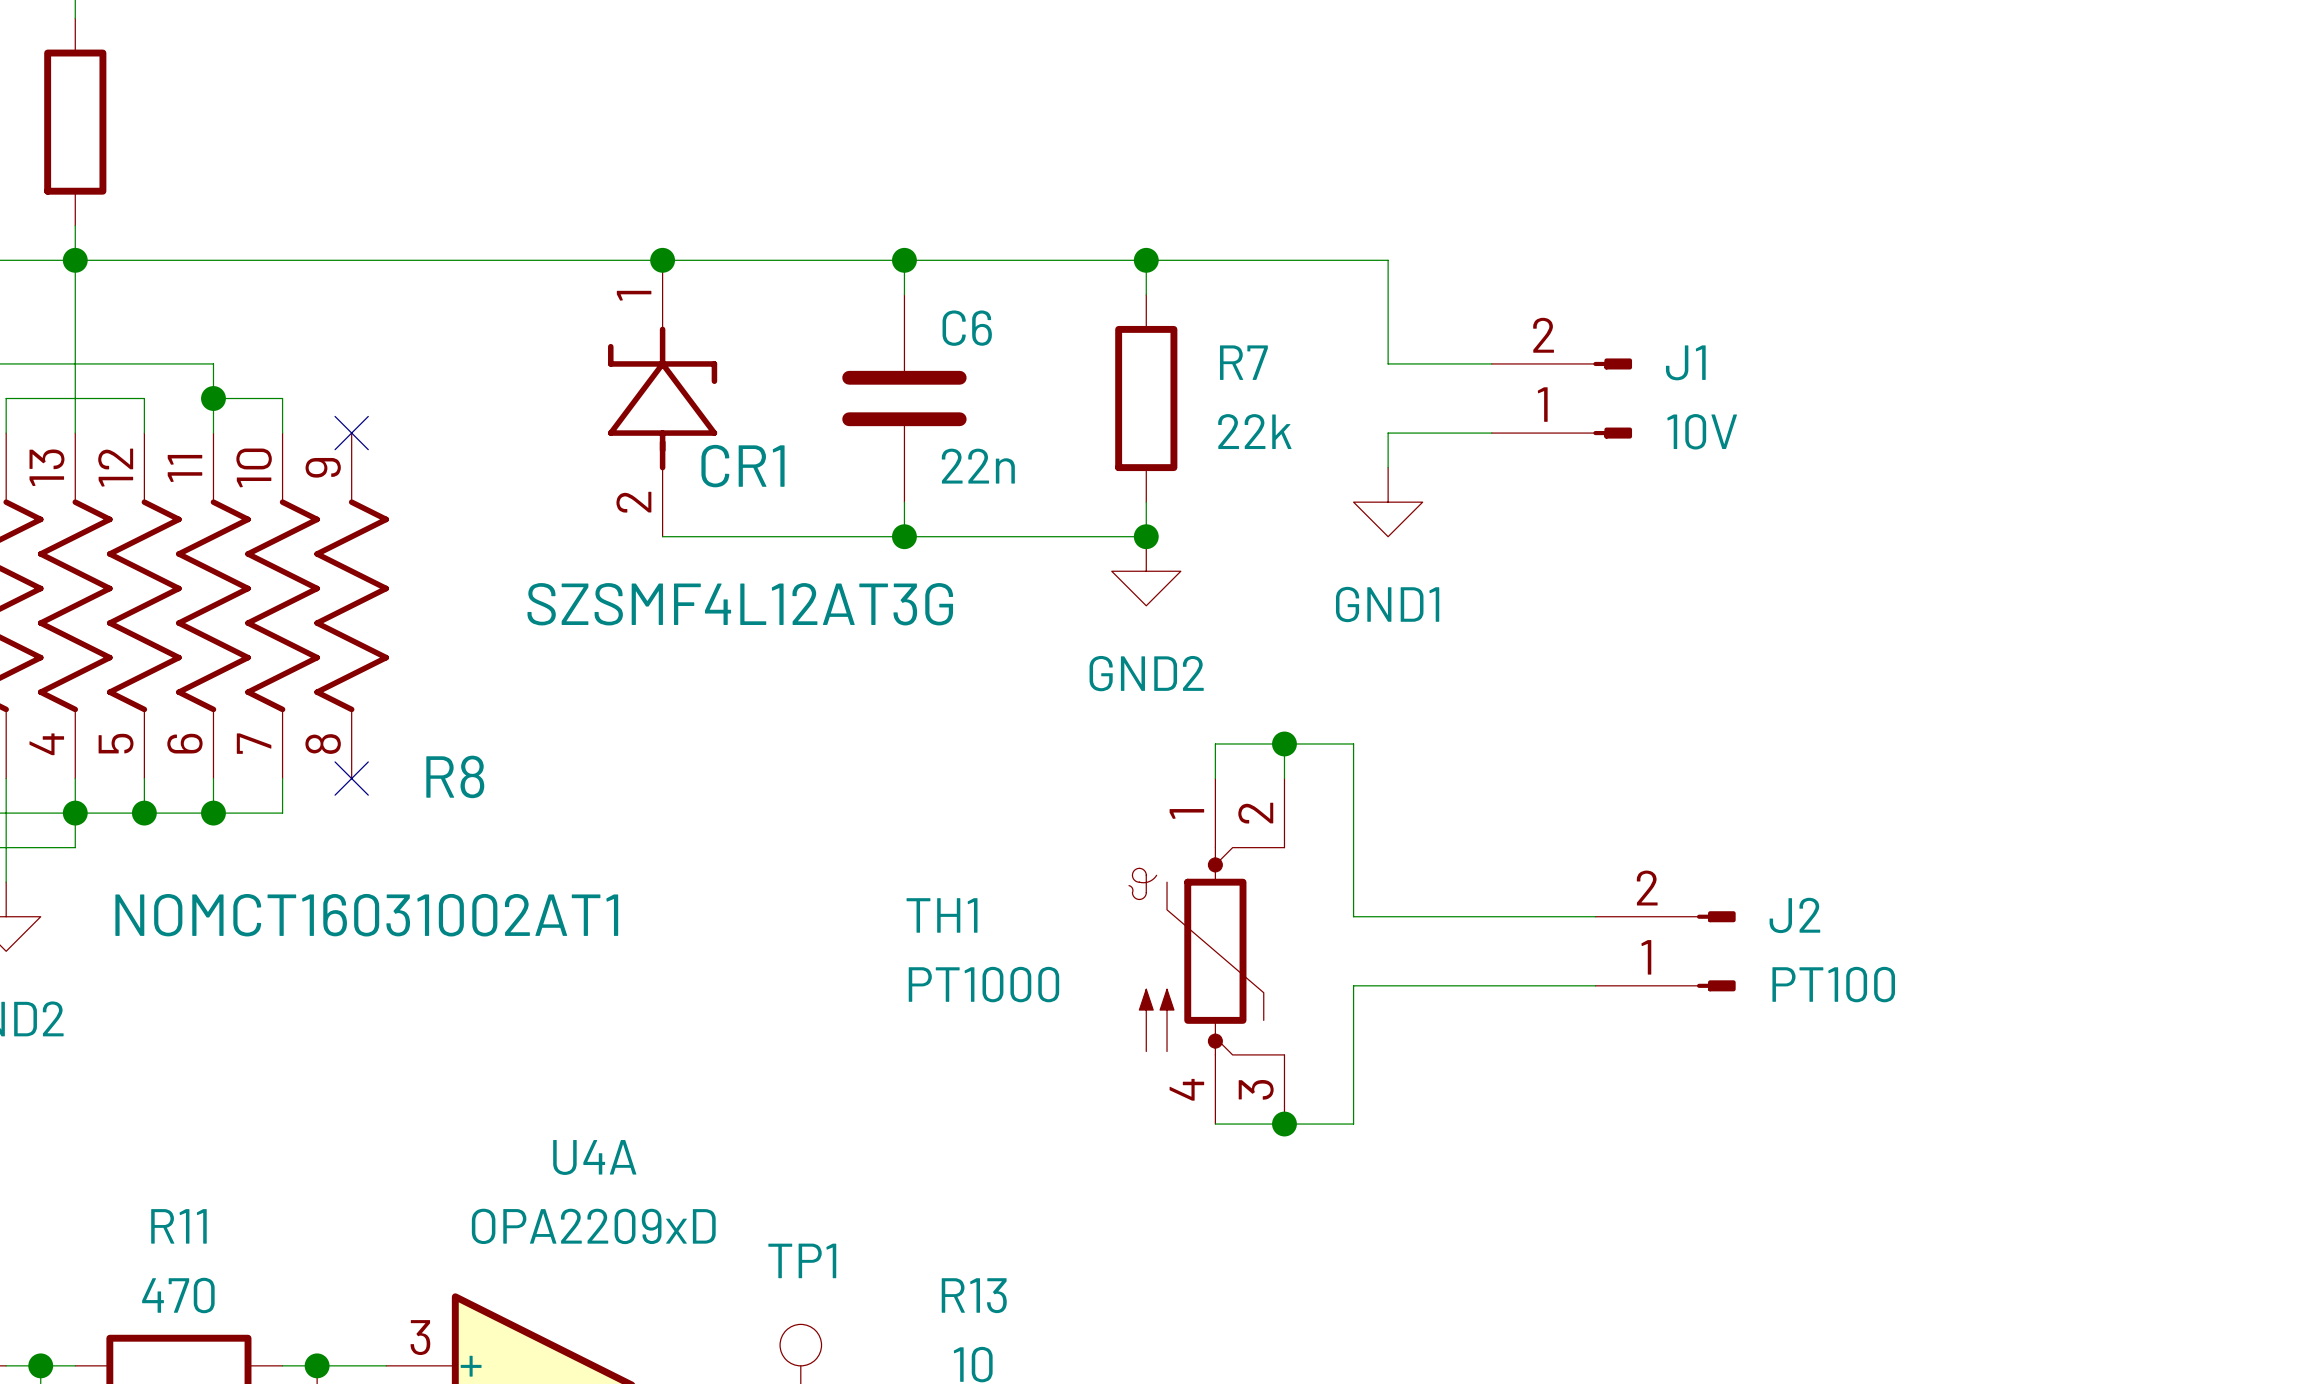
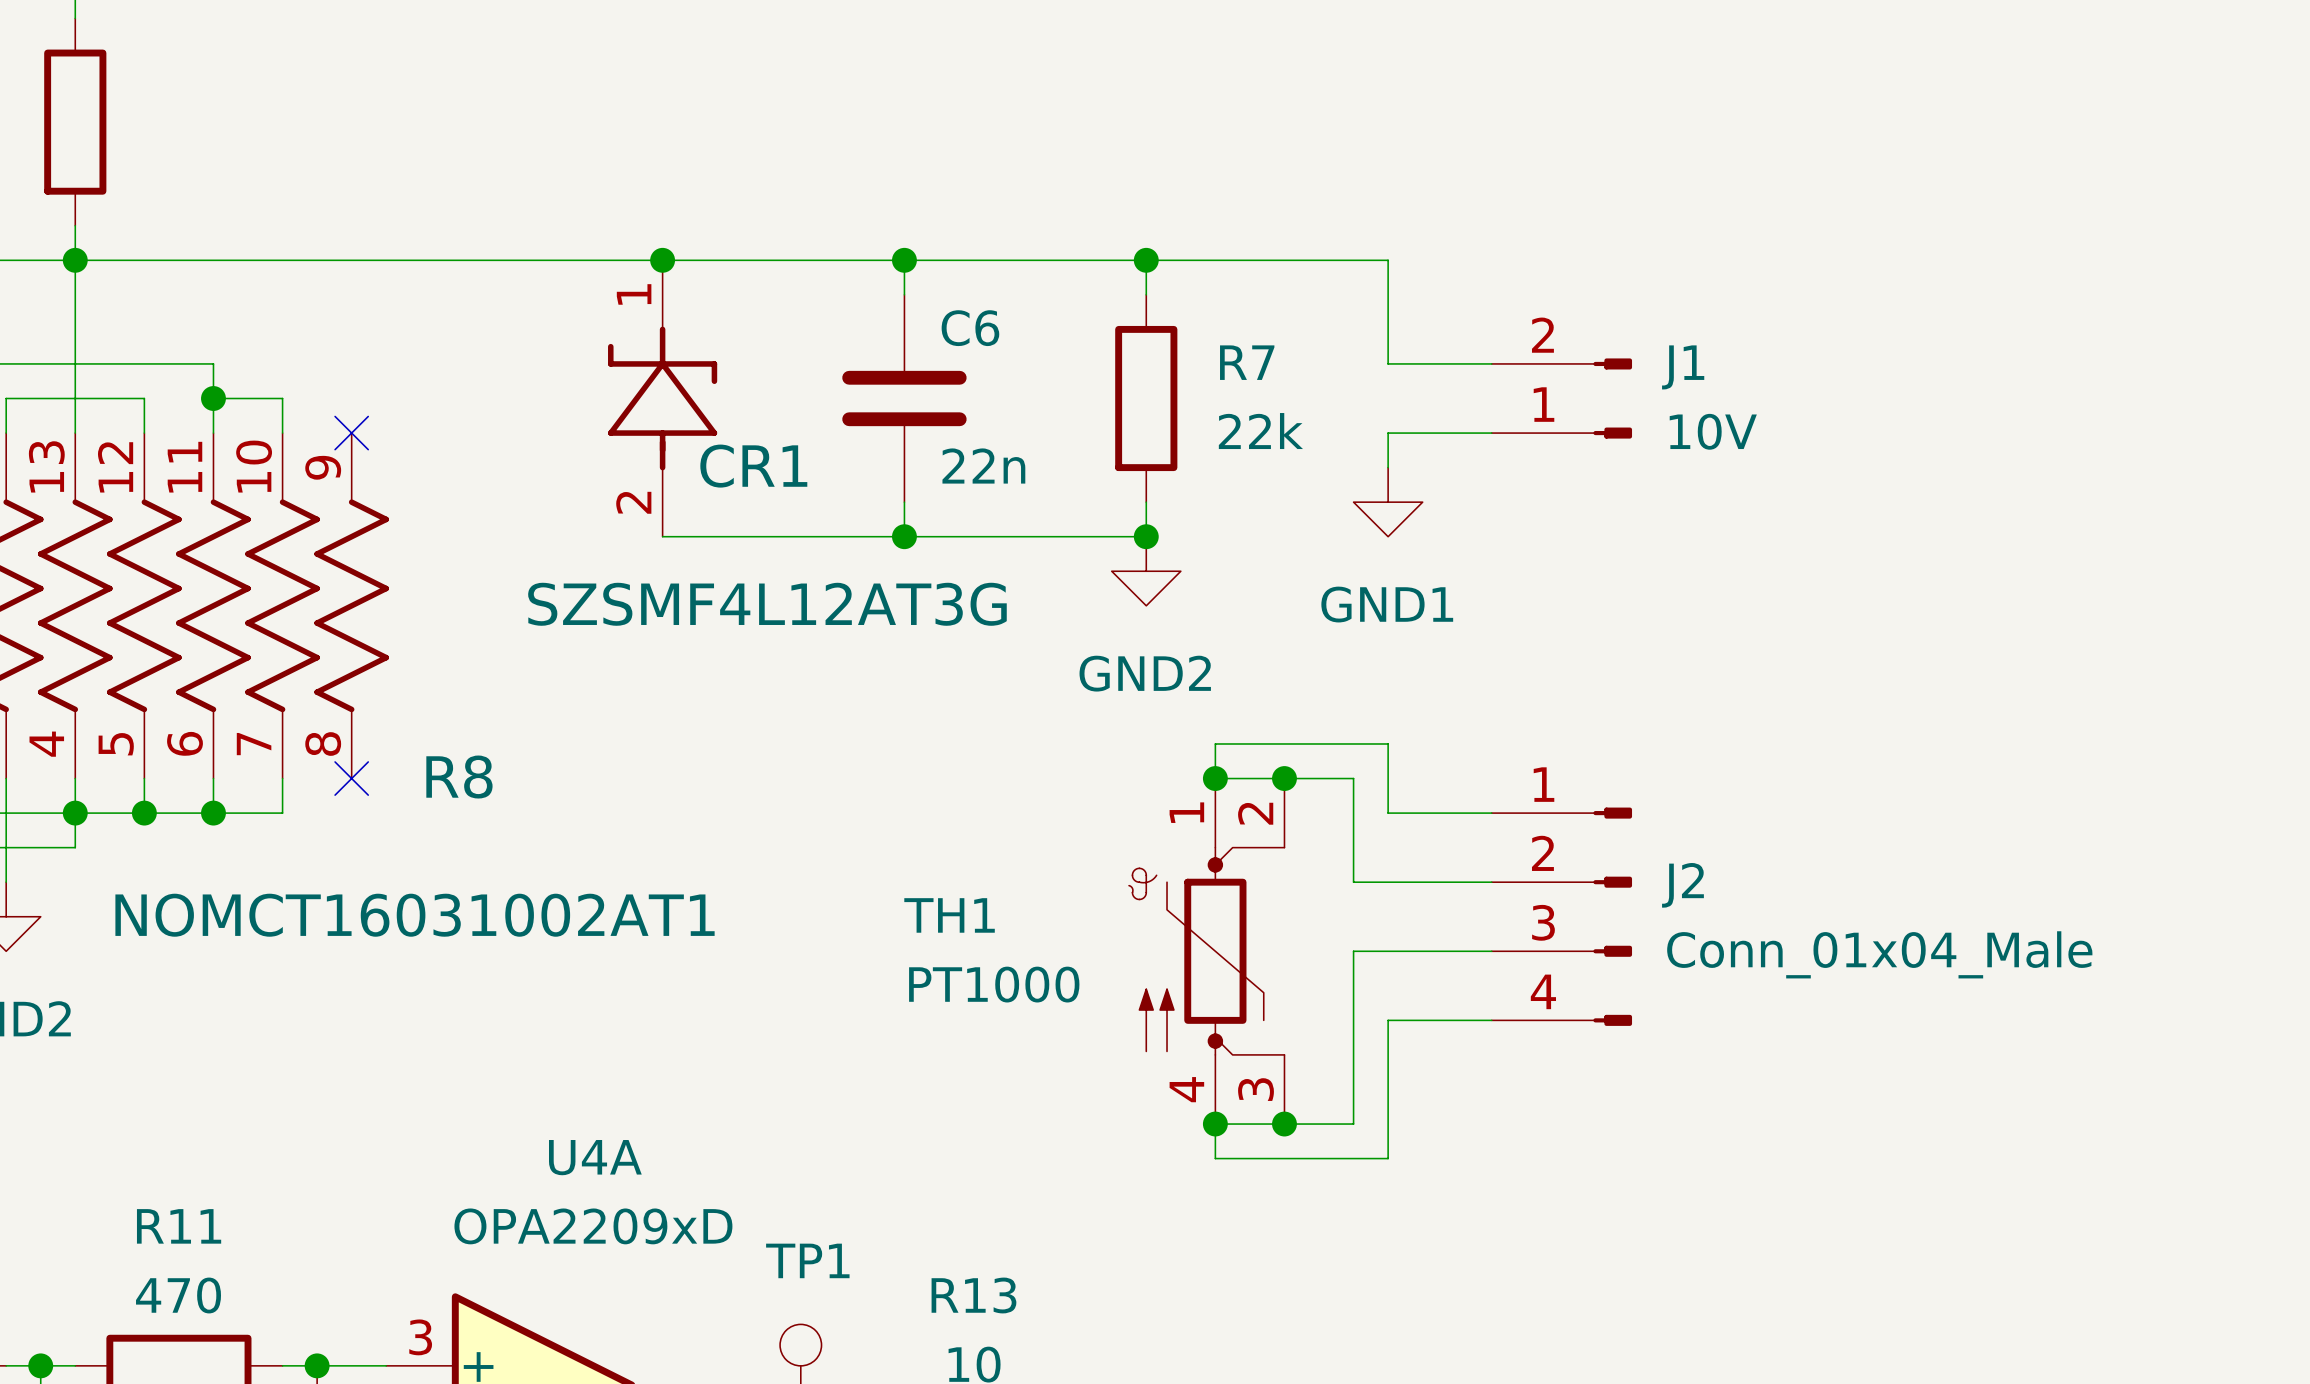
wire: (1284, 743) (1284, 778) -> none
junction position: (1284, 743) -> (1284, 778)
wire: (1353, 743) (1353, 778) -> (1215, 778) (1353, 778)
wire: none -> (1353, 743) (1388, 743) (1388, 813) (1491, 813)
junction: none -> (1215, 778)
wire: (1353, 882) (1353, 916) (1595, 916) -> (1353, 882) (1491, 882)
J2 symbol: [1595, 911, 1736, 992] -> [1491, 807, 1633, 1026]
J2 value: PT100 (1833, 984) -> Conn_01x04_Male (1879, 954)
wire: (1353, 985) (1595, 985) -> (1353, 985) (1353, 951) (1491, 951)
wire: none -> (1491, 1020) (1388, 1020) (1388, 1158) (1215, 1158) (1215, 1124)
junction: none -> (1215, 1124)

